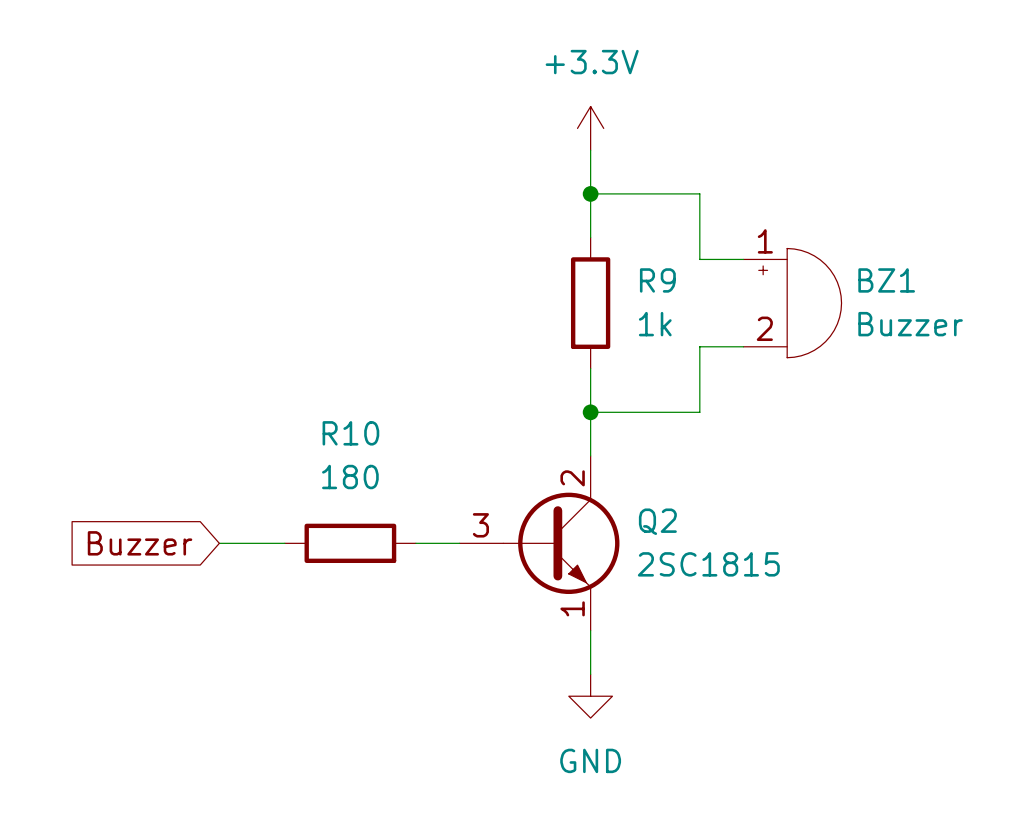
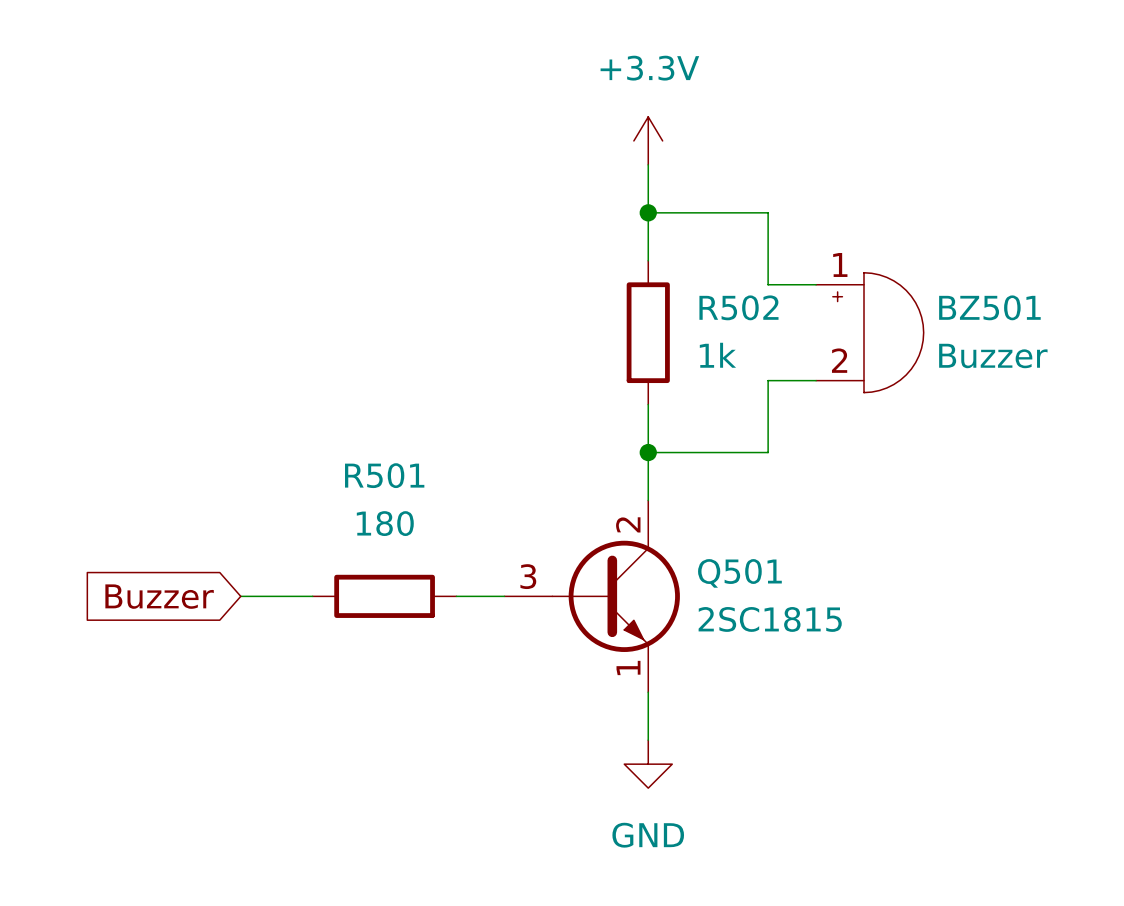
R9 name: R9 (657, 280) -> R502 (738, 307)
BZ1 name: BZ1 (886, 280) -> BZ501 (989, 307)
R10 name: R10 (350, 433) -> R501 (384, 475)
Q2 name: Q2 (657, 521) -> Q501 (739, 573)

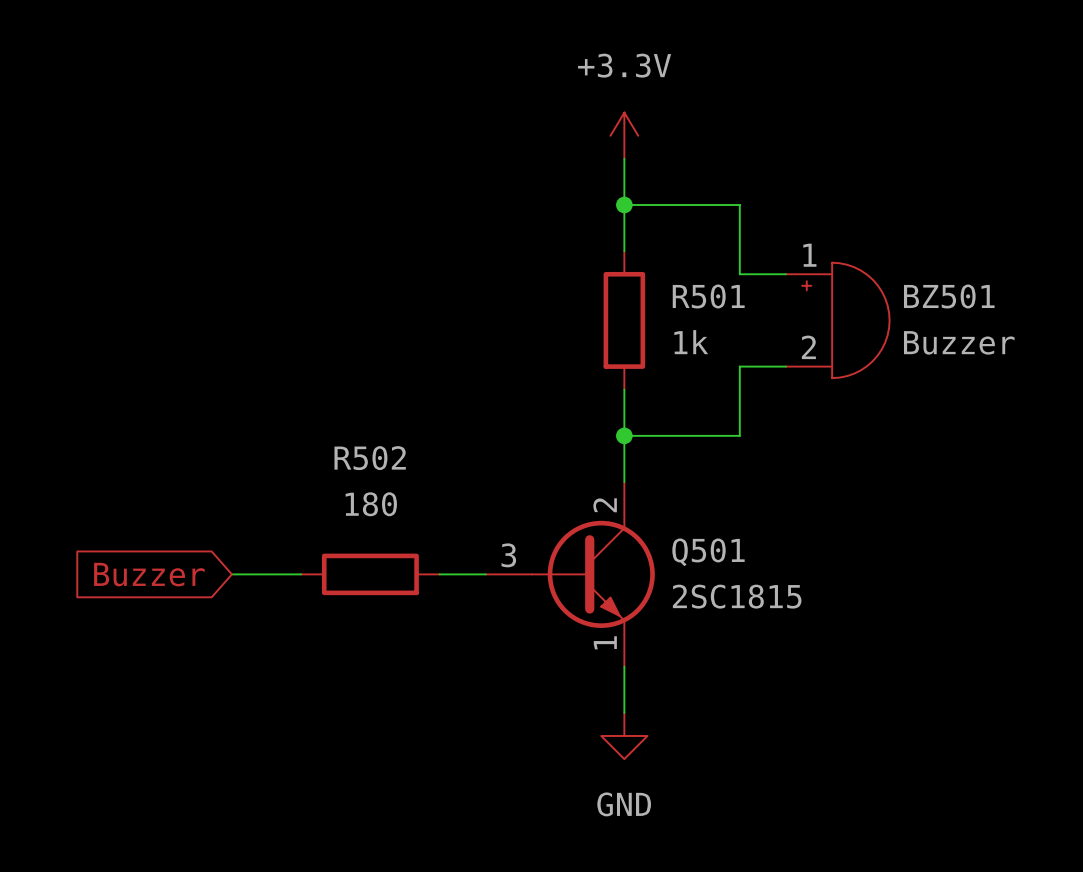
R502 name: R502 (738, 307) -> R501 (708, 296)
R501 name: R501 (384, 475) -> R502 (370, 458)

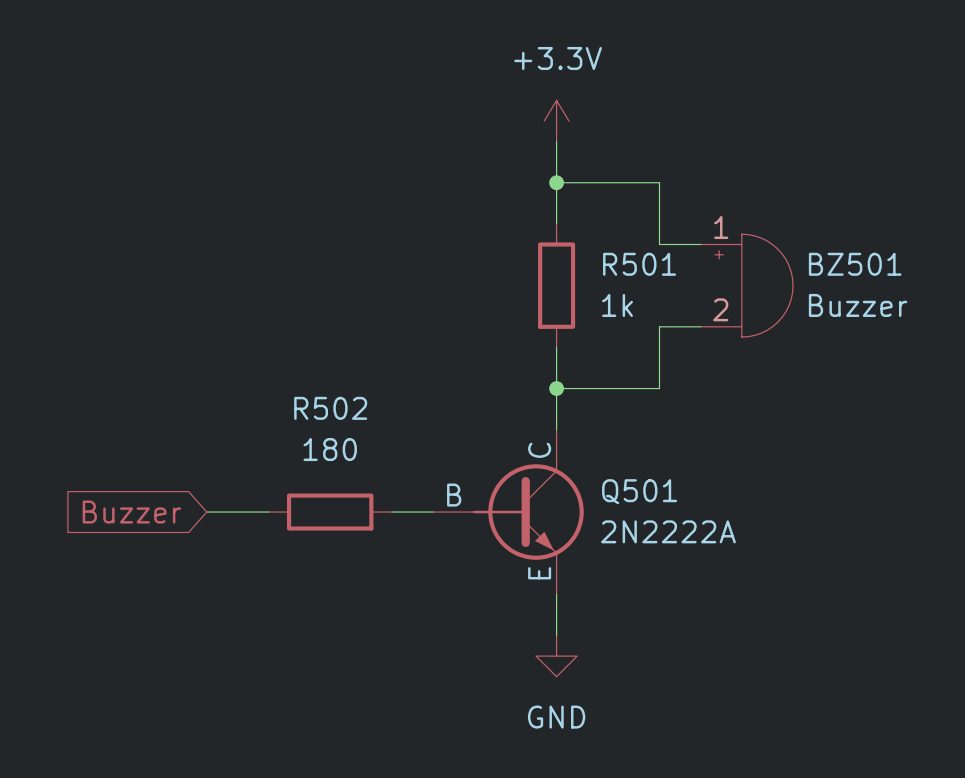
Q501 symbol: [485, 482, 655, 667] -> [433, 429, 584, 595]
Q501 value: 2SC1815 (737, 596) -> 2N2222A (668, 531)

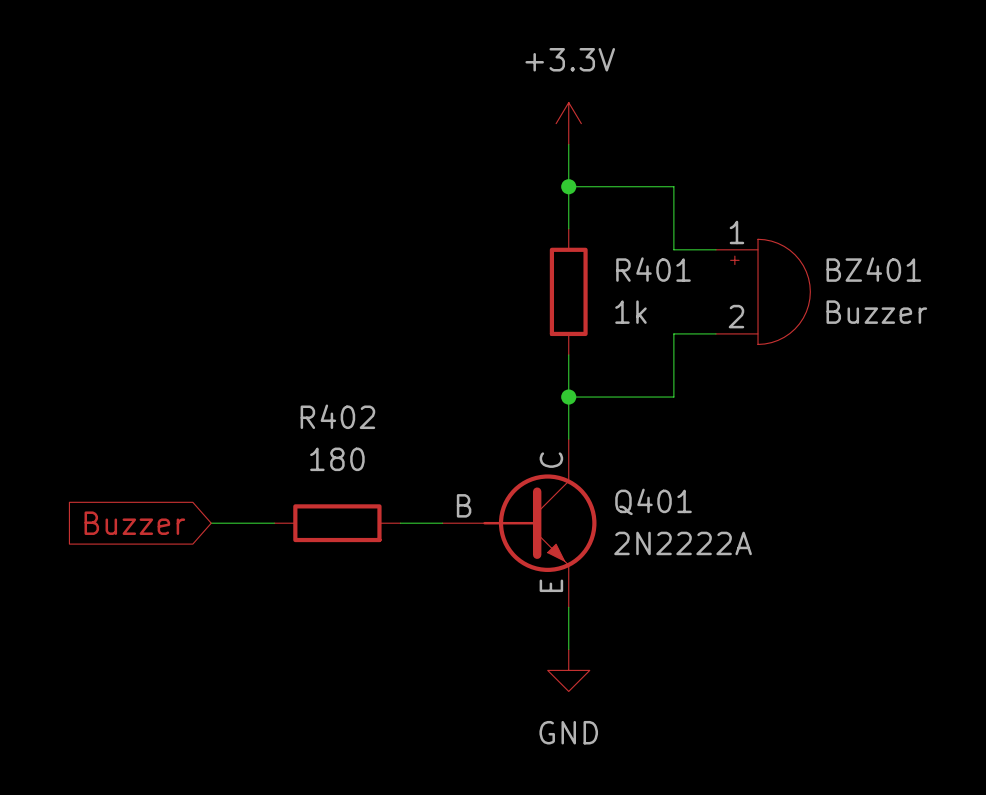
R501 name: R501 (639, 264) -> R401 (653, 269)
BZ501 name: BZ501 (855, 264) -> BZ401 (873, 269)
R502 name: R502 (330, 408) -> R402 (337, 416)
Q501 name: Q501 (639, 491) -> Q401 (653, 501)

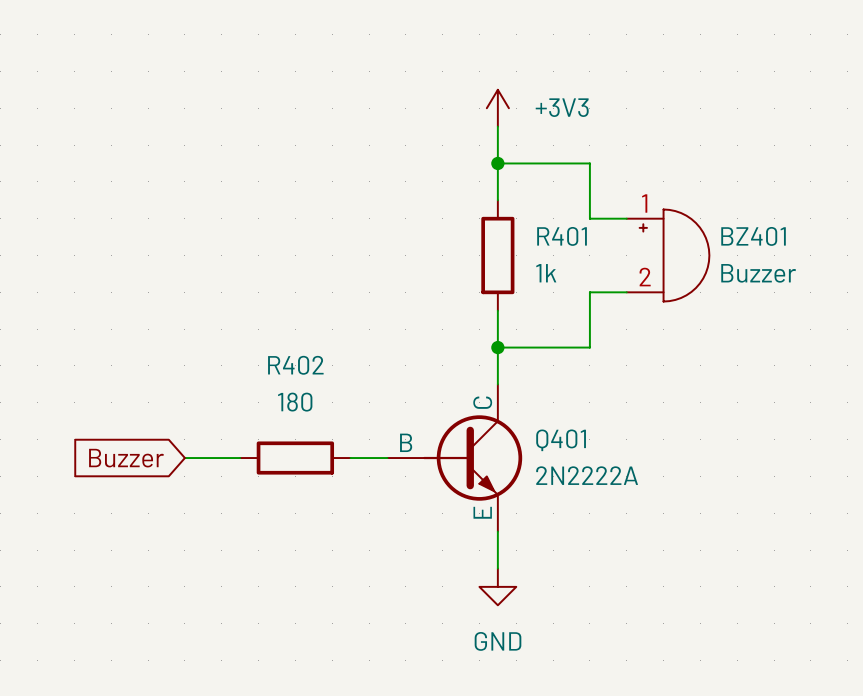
power symbol: +3.3V (568, 123) -> +3V3 (497, 108)

